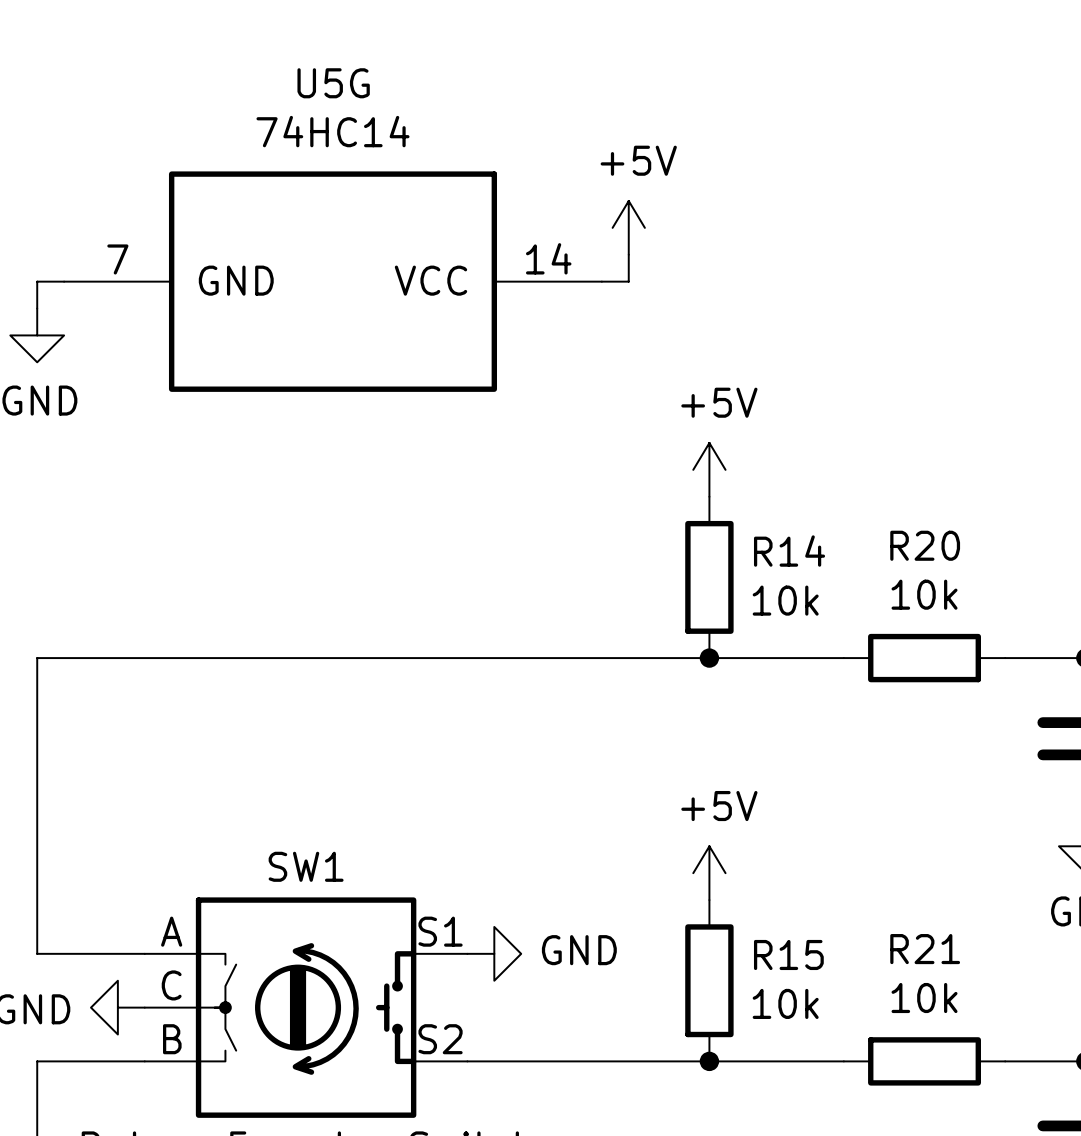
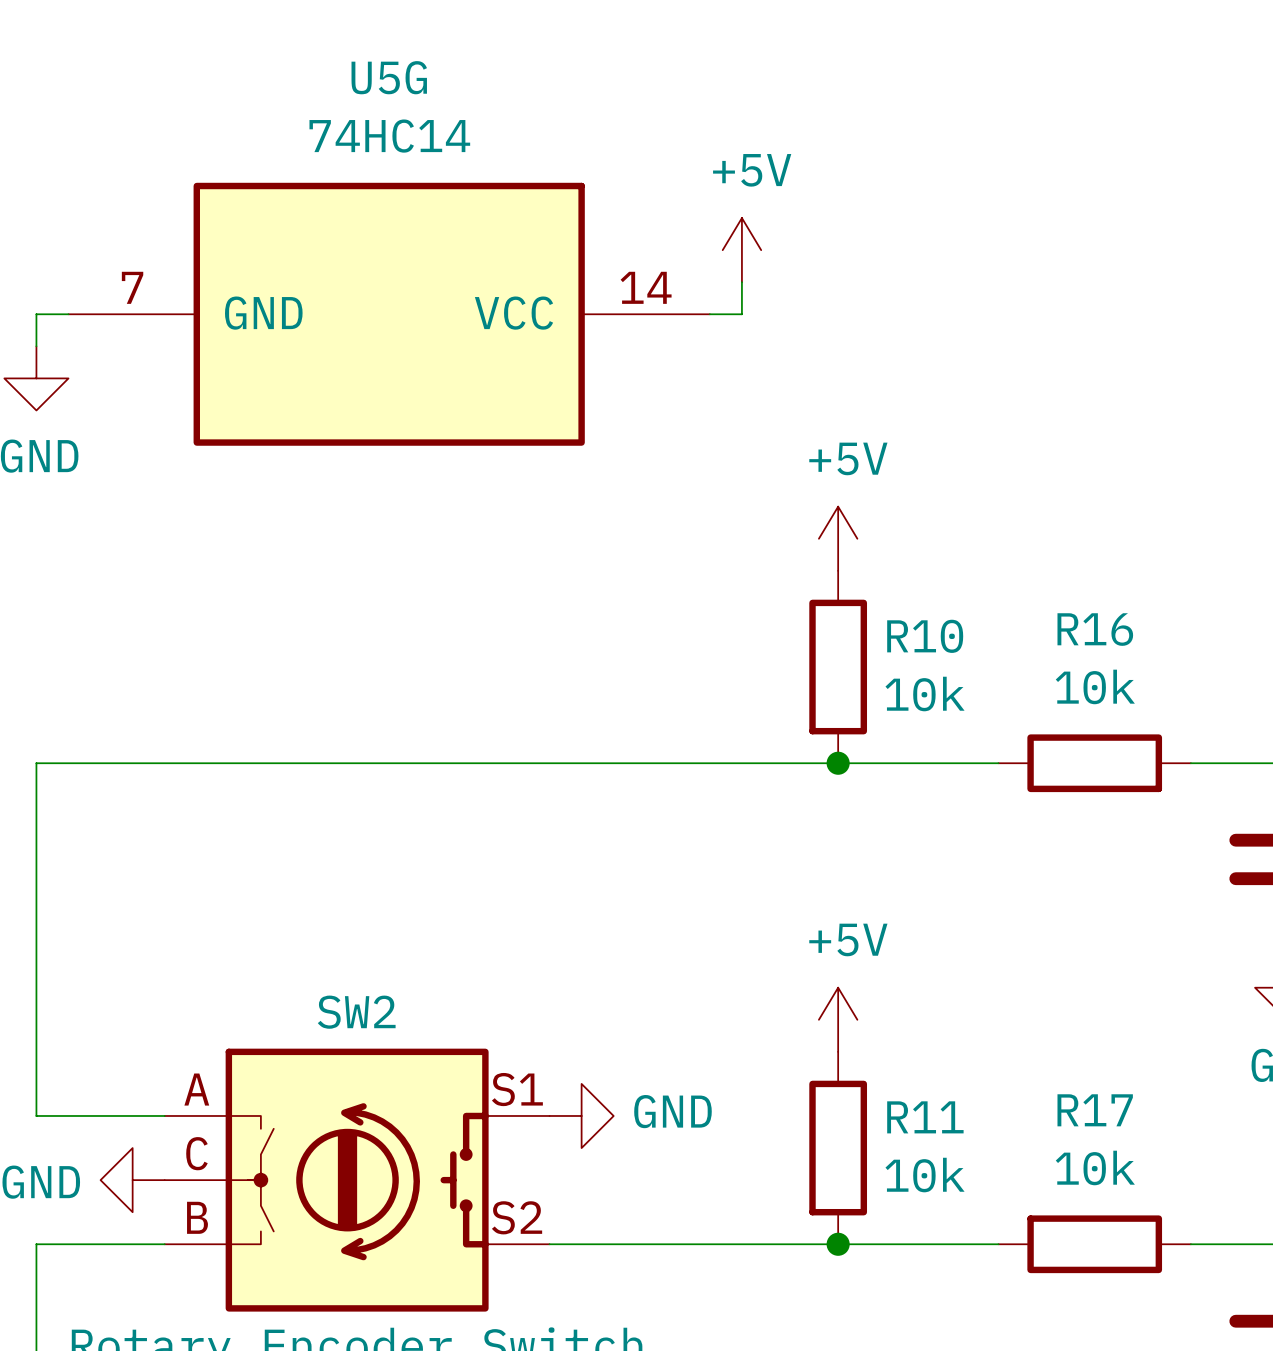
R20 name: R20 (925, 545) -> R16 (1095, 629)
R14 name: R14 (789, 551) -> R10 (925, 636)
SW1 name: SW1 (306, 866) -> SW2 (356, 1012)
R21 name: R21 (925, 949) -> R17 (1095, 1110)
R15 name: R15 (788, 954) -> R11 (925, 1117)

